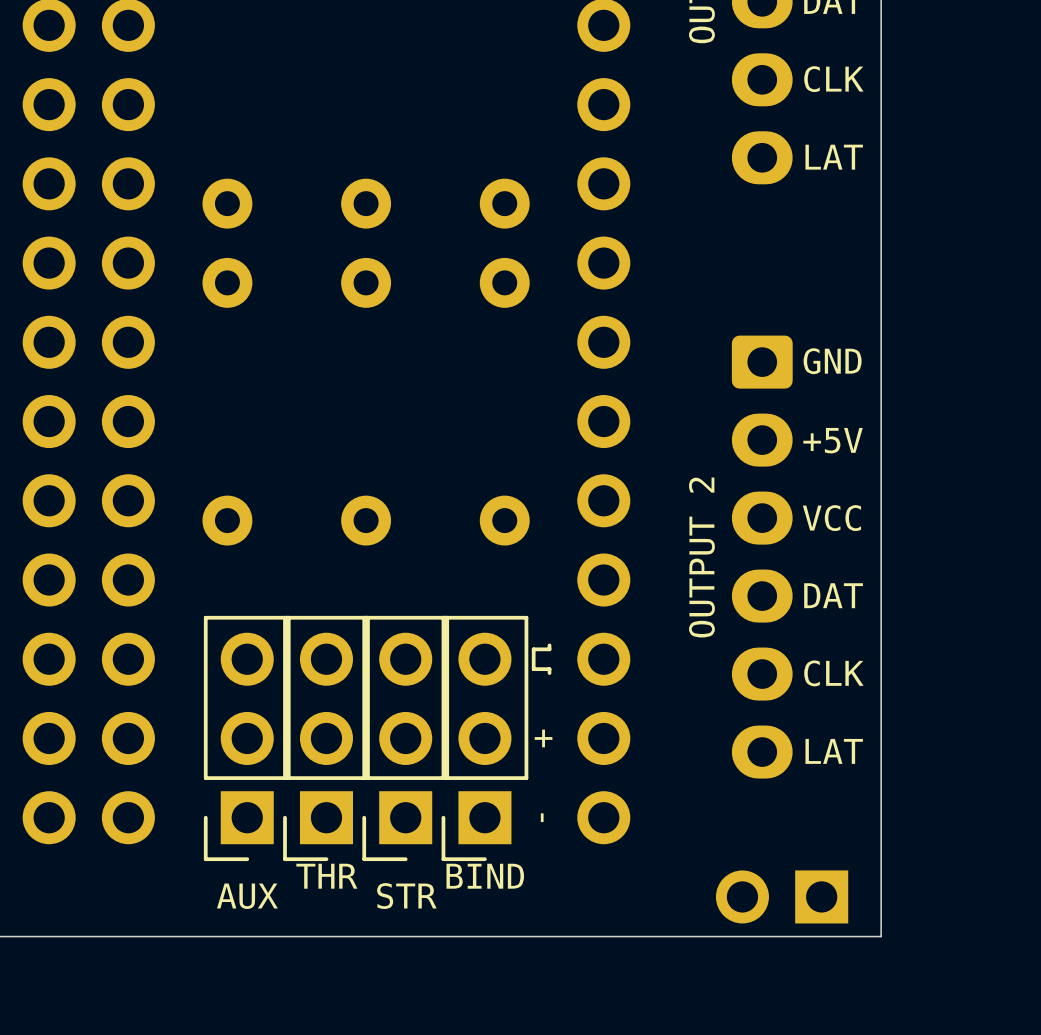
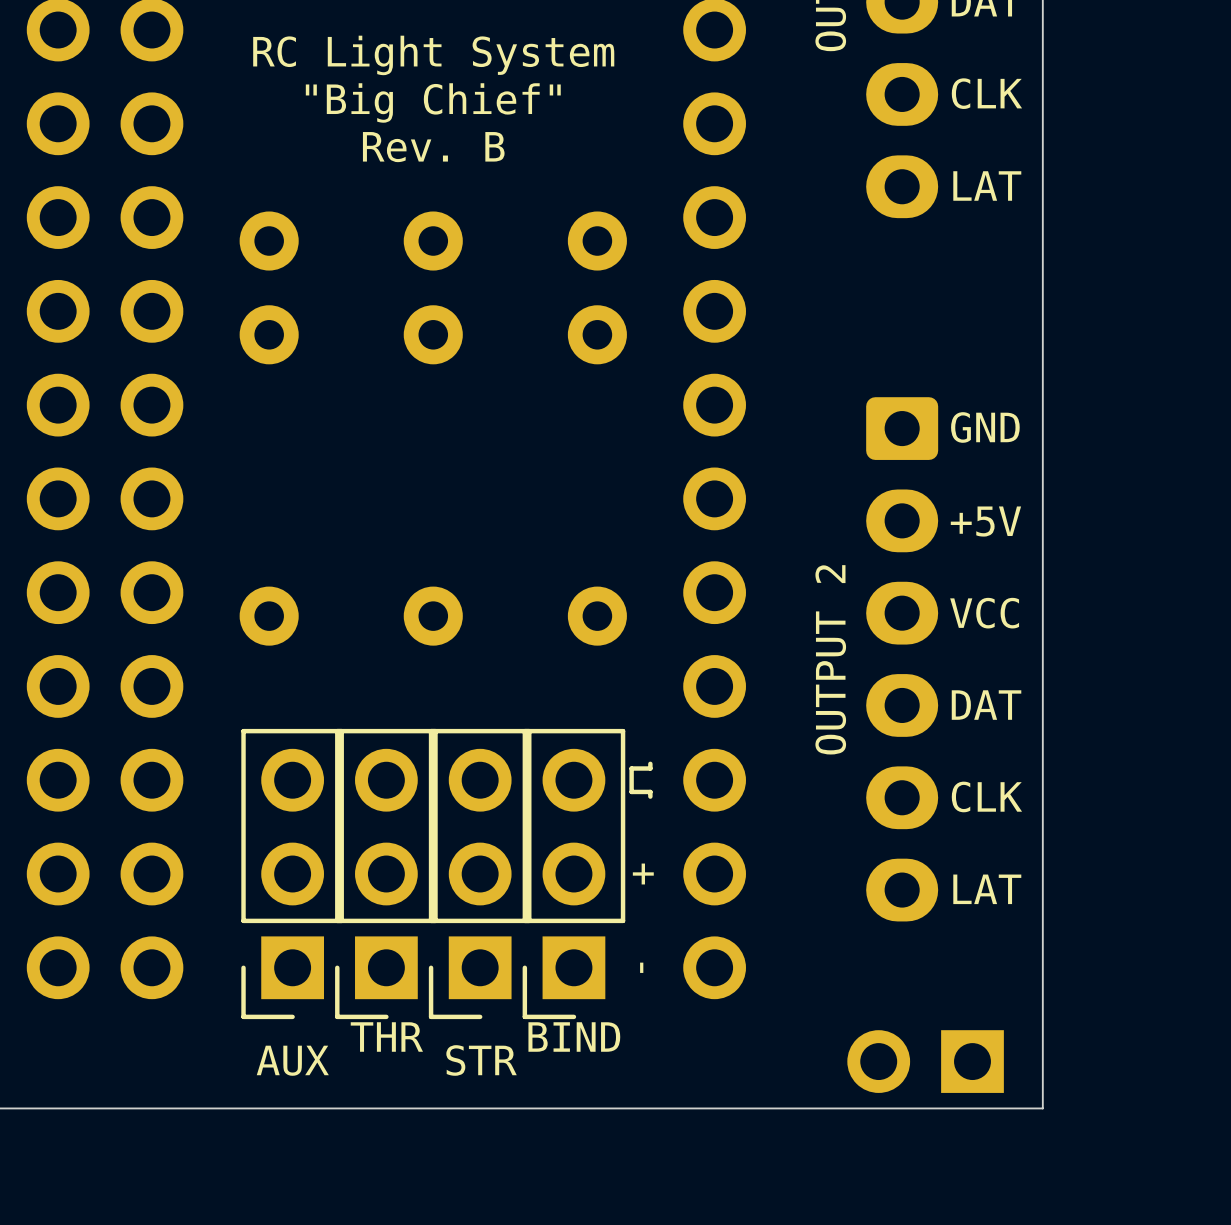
text: none -> RC Light System (433, 55)
text: none -> "Big Chief" (433, 102)
text: none -> Rev. B (433, 147)

